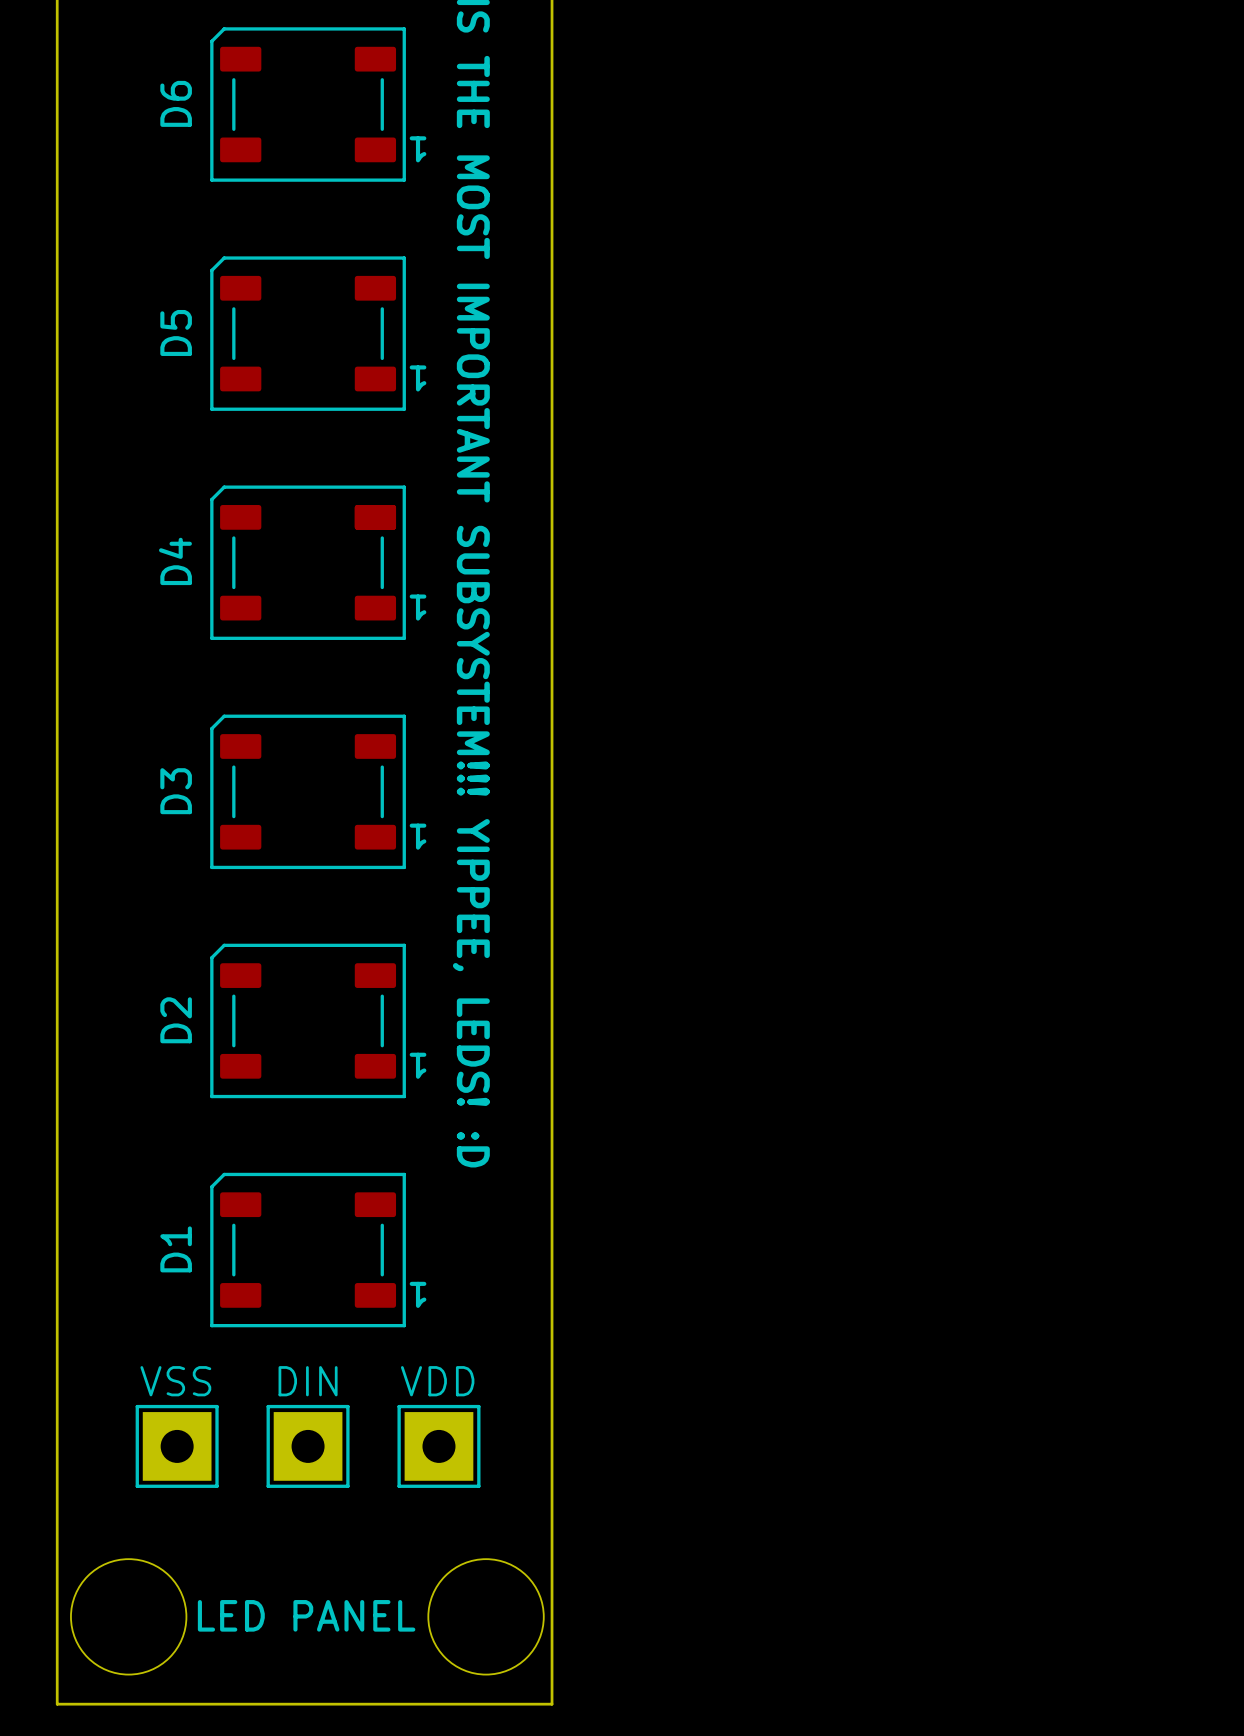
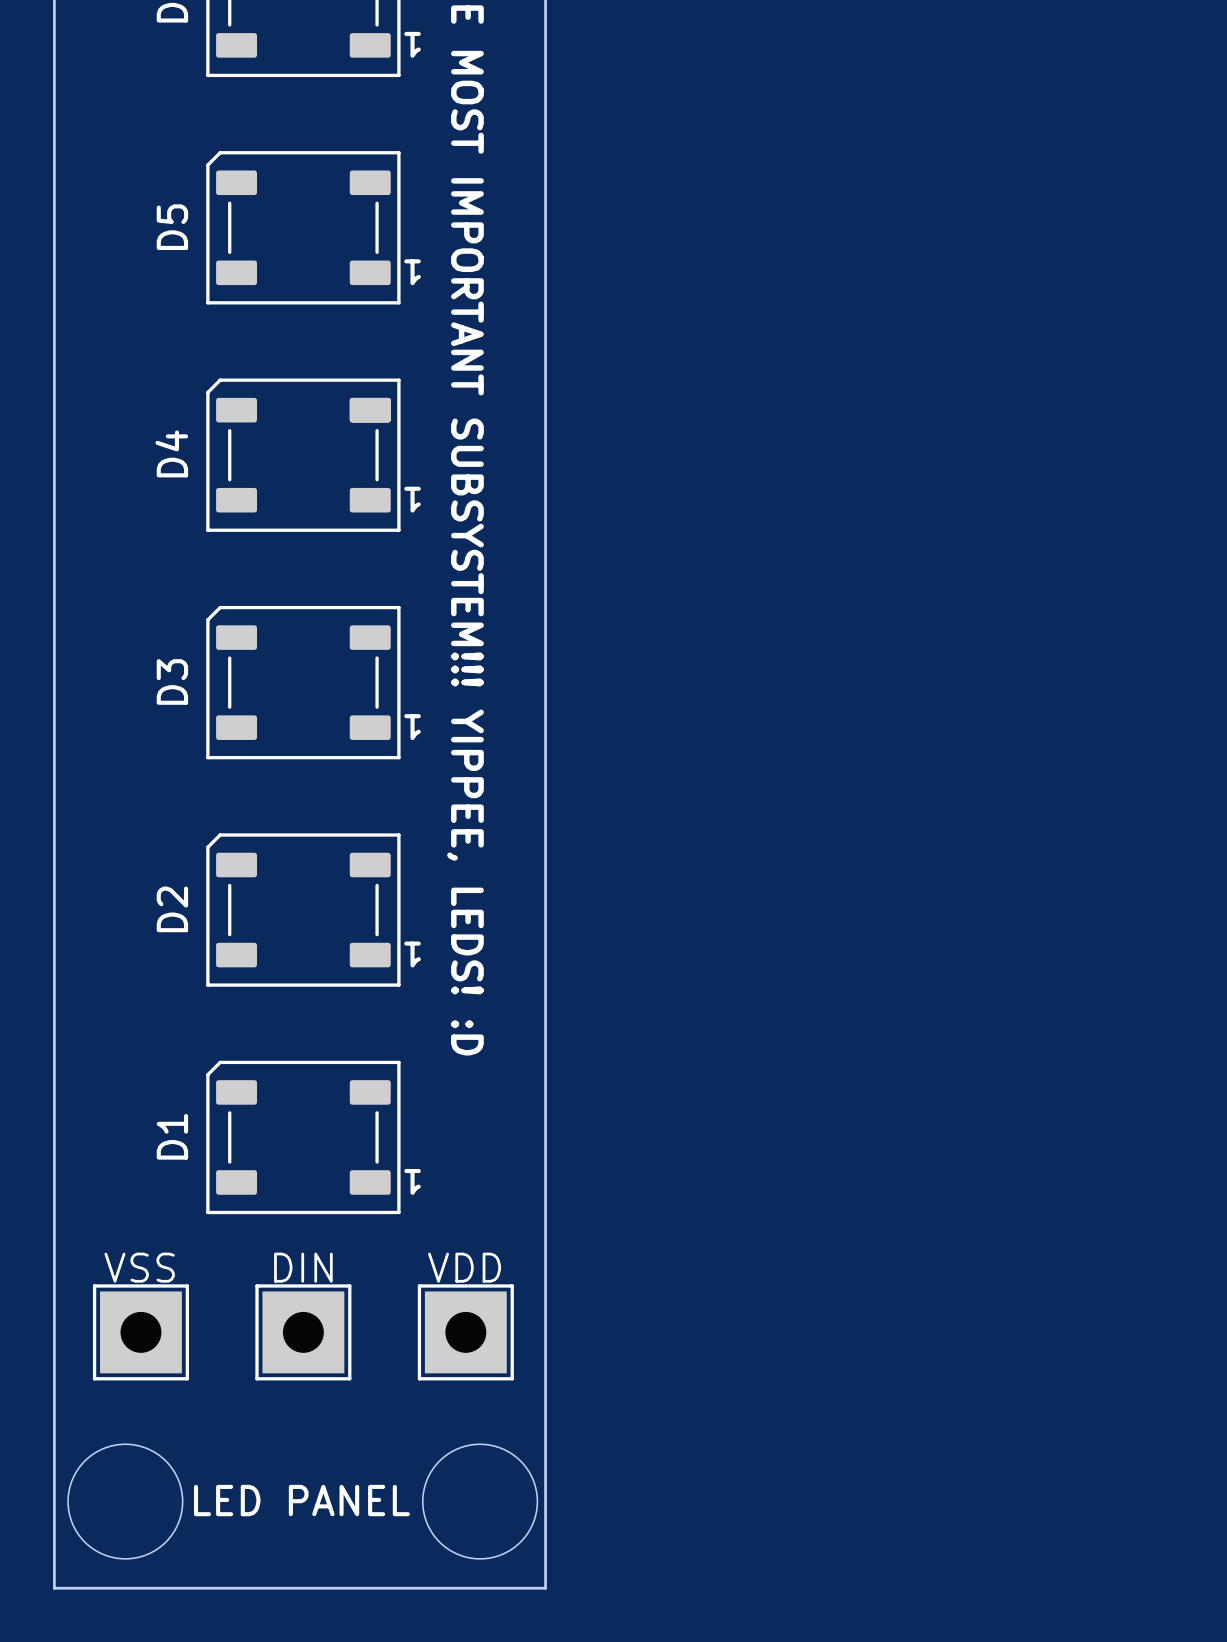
text position: VSS (175, 1381) -> VSS (139, 1267)
text position: VDD (437, 1381) -> VDD (464, 1267)
part footprint: [266, 1404, 350, 1488] -> [255, 1284, 352, 1381]
part: none -> (140, 1332)
part: (177, 1446) -> none
part: (438, 1446) -> none
part: none -> (465, 1332)

